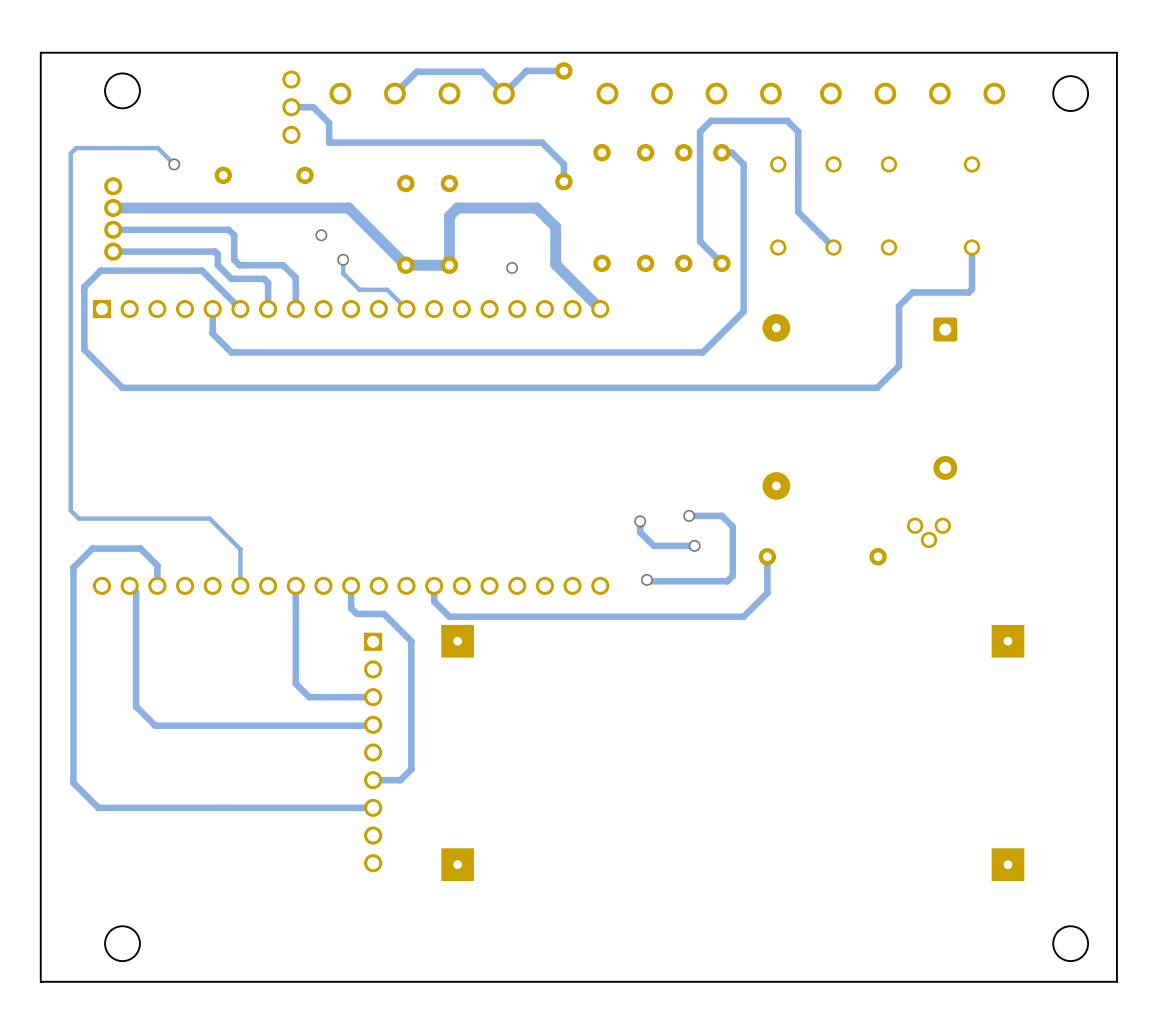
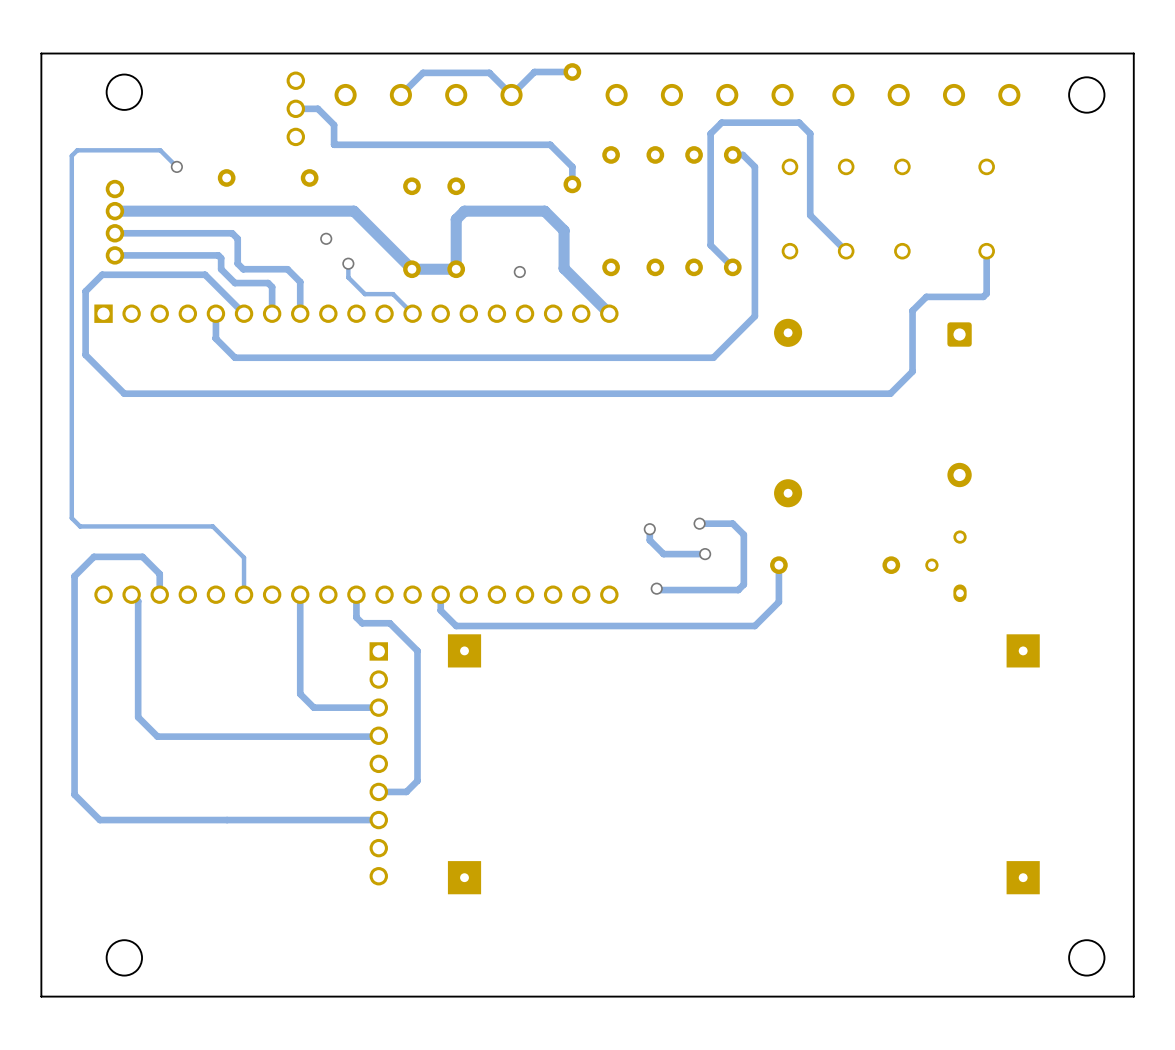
part: (928, 532) -> none
part: none -> (945, 566)

